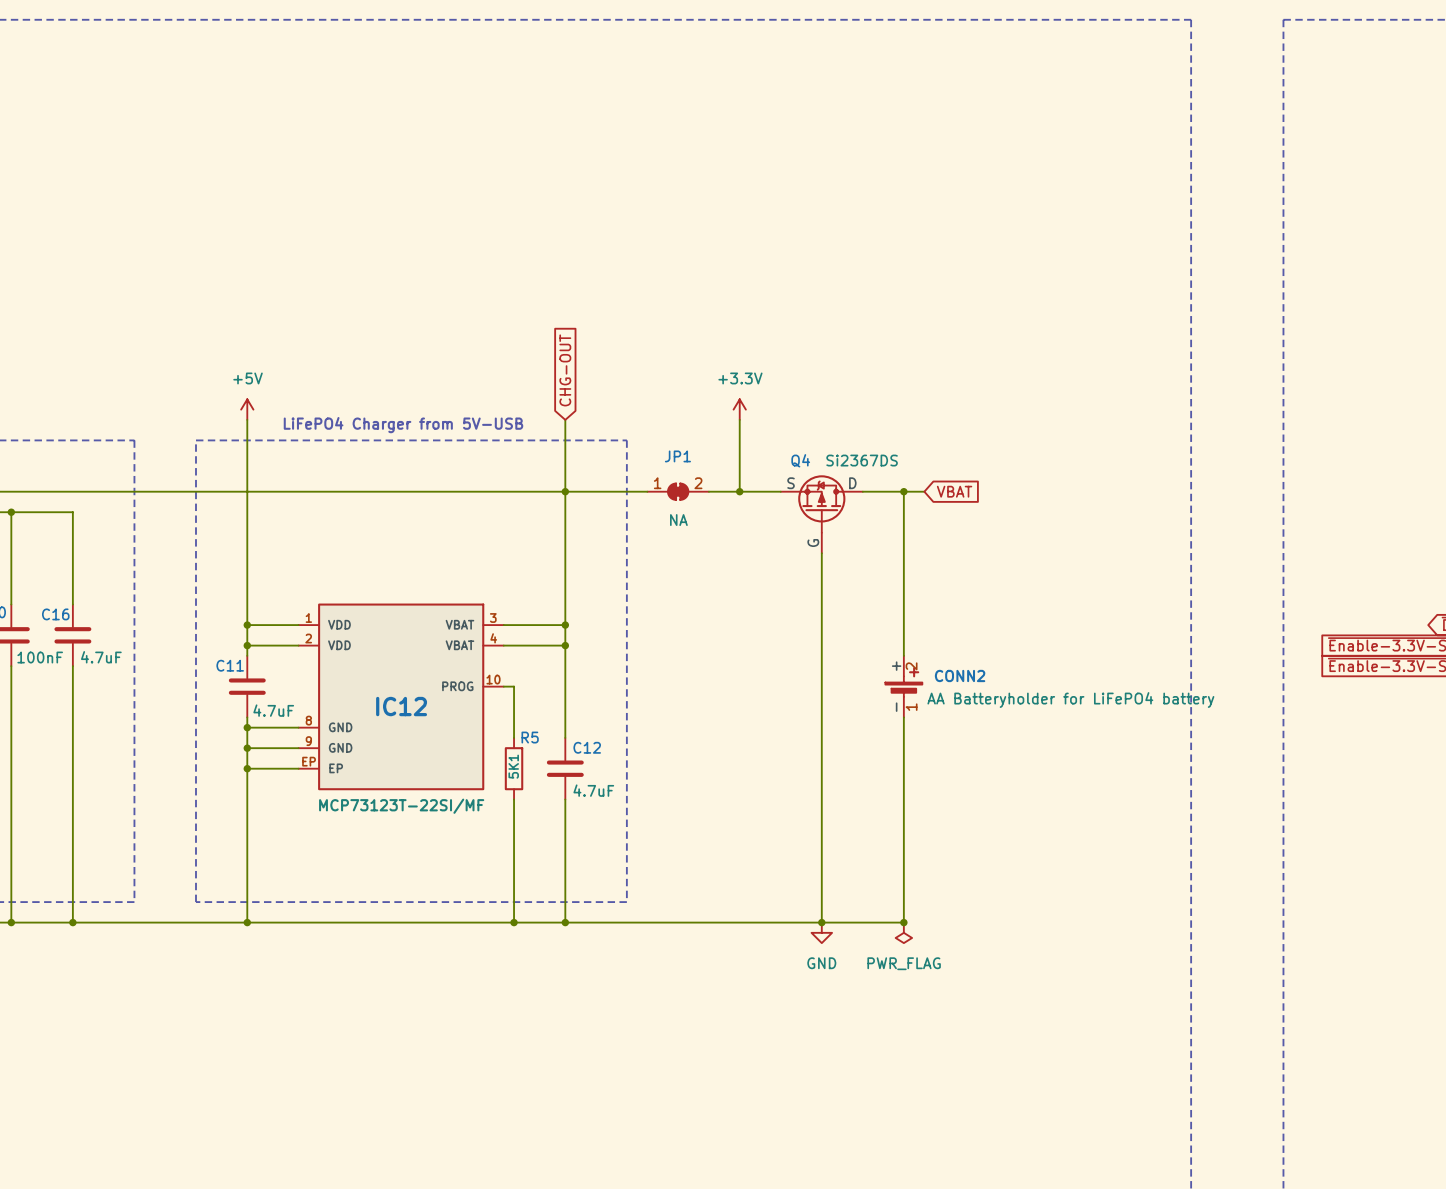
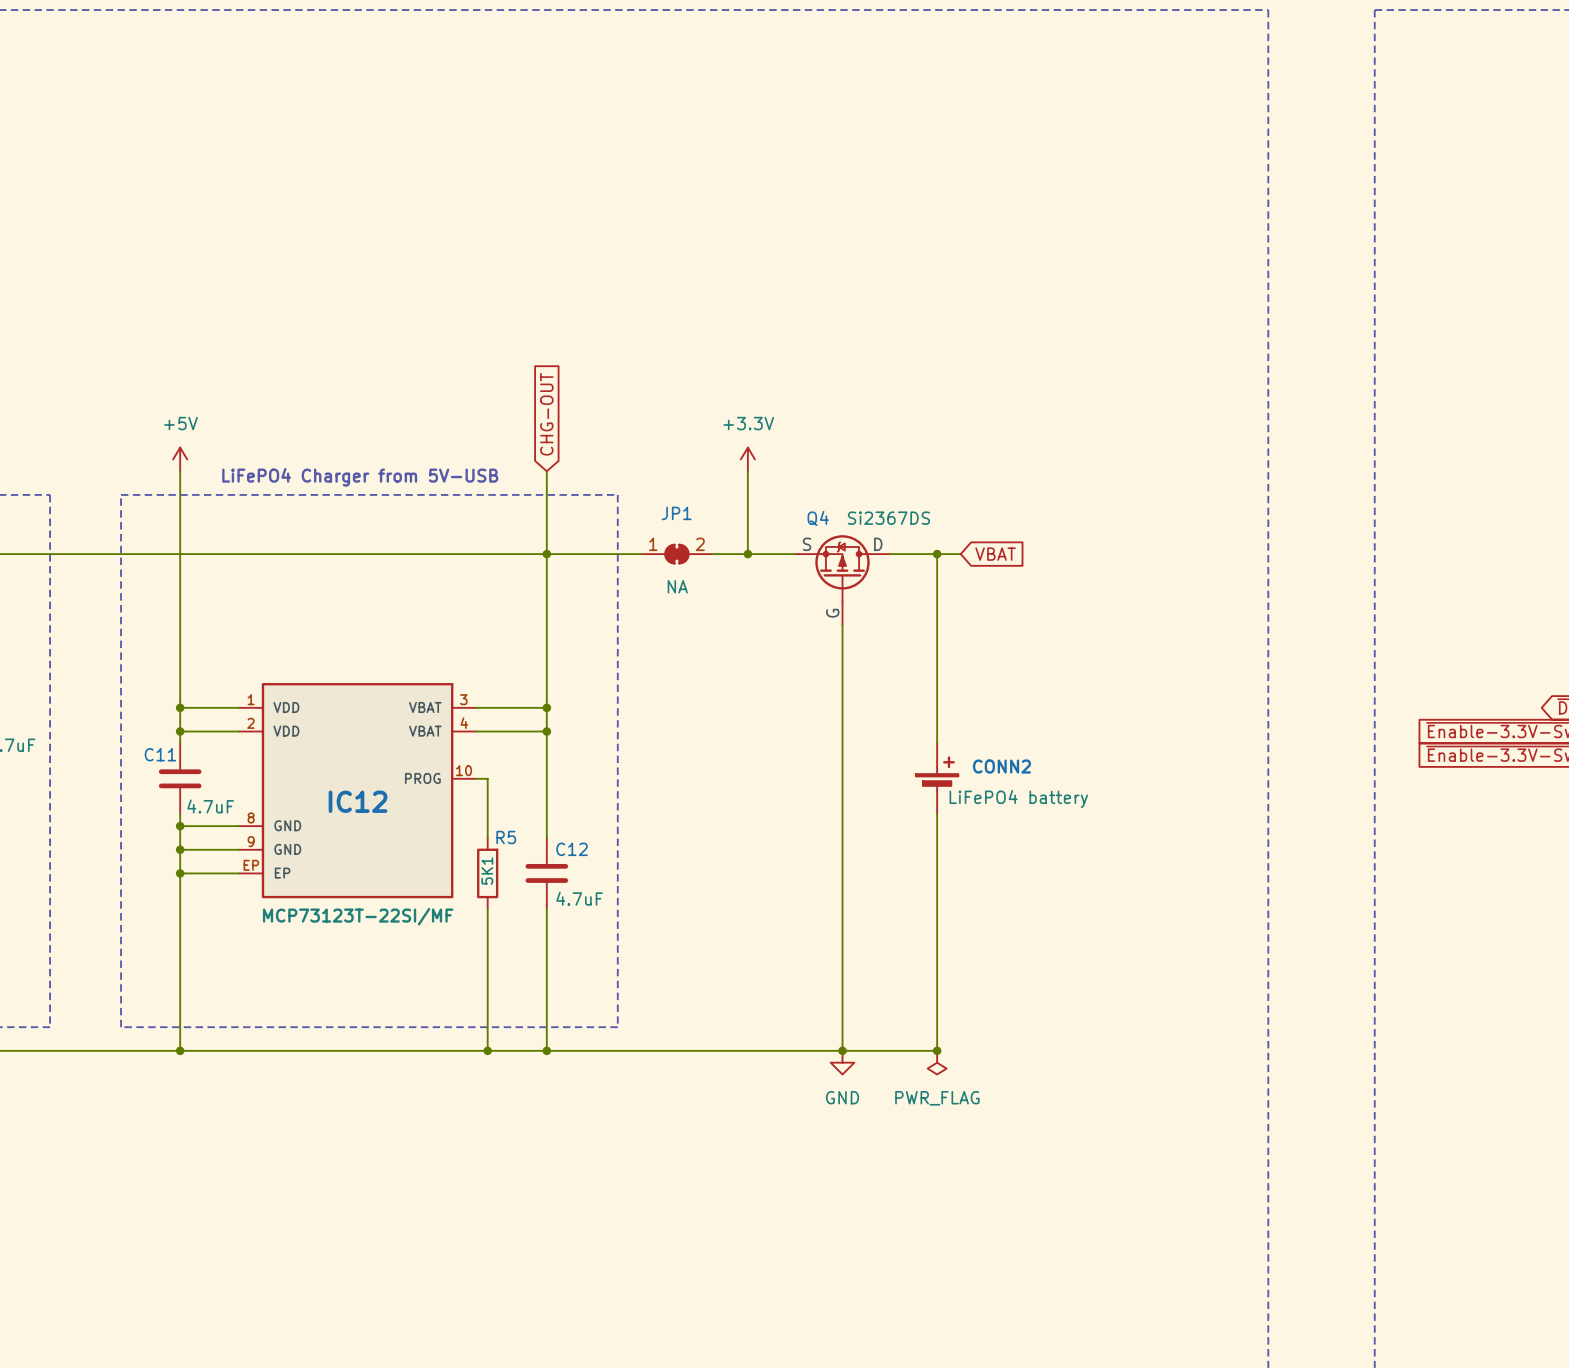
CONN2 pin name: + (896, 666) -> none
CONN2 pin number: 2 (911, 666) -> none
CONN2 value: AA Batteryholder for LiFePO4 battery (1070, 700) -> LiFePO4 battery (1018, 798)
CONN2 pin name: - (896, 707) -> none
CONN2 pin number: 1 (911, 707) -> none

